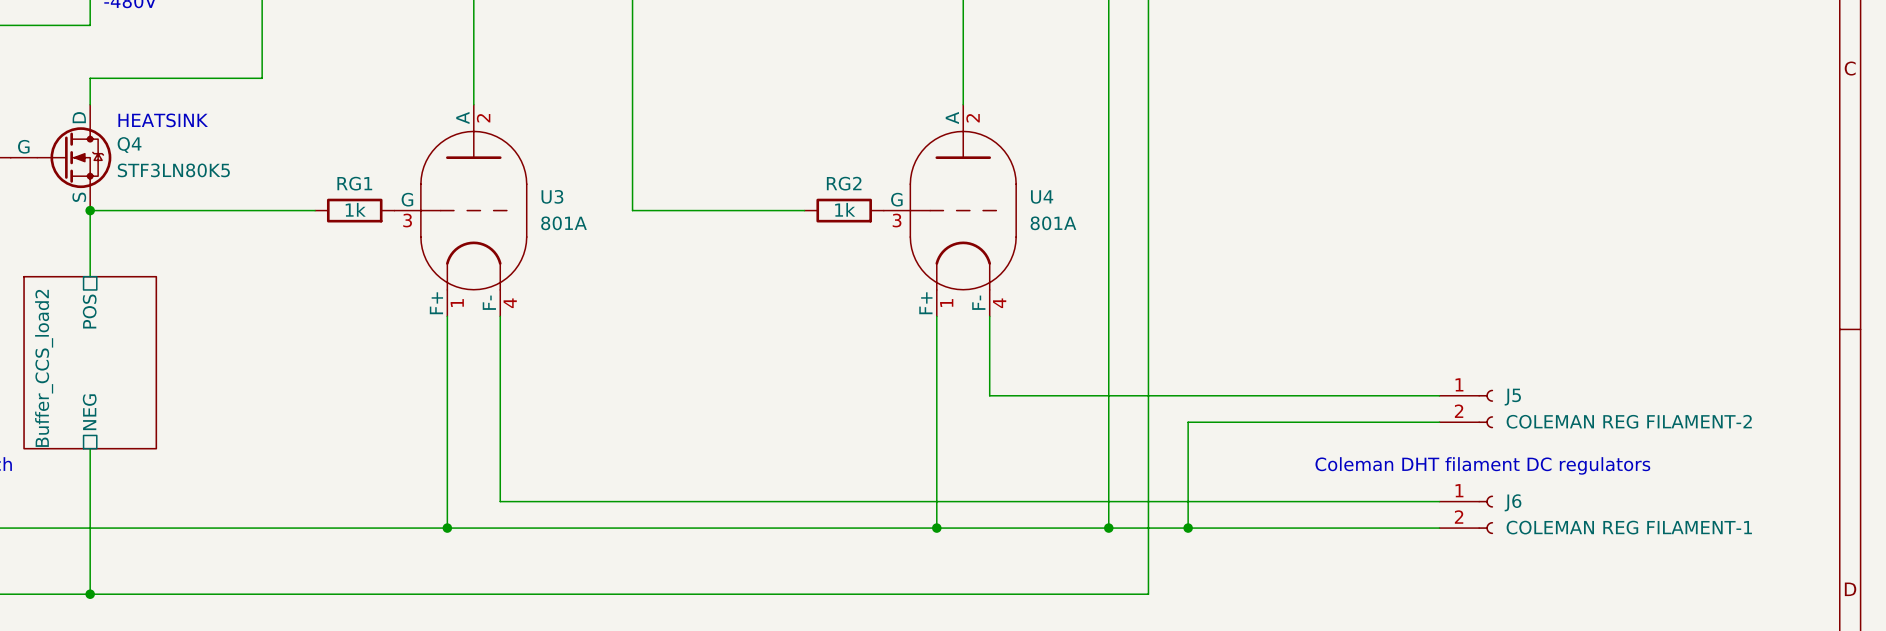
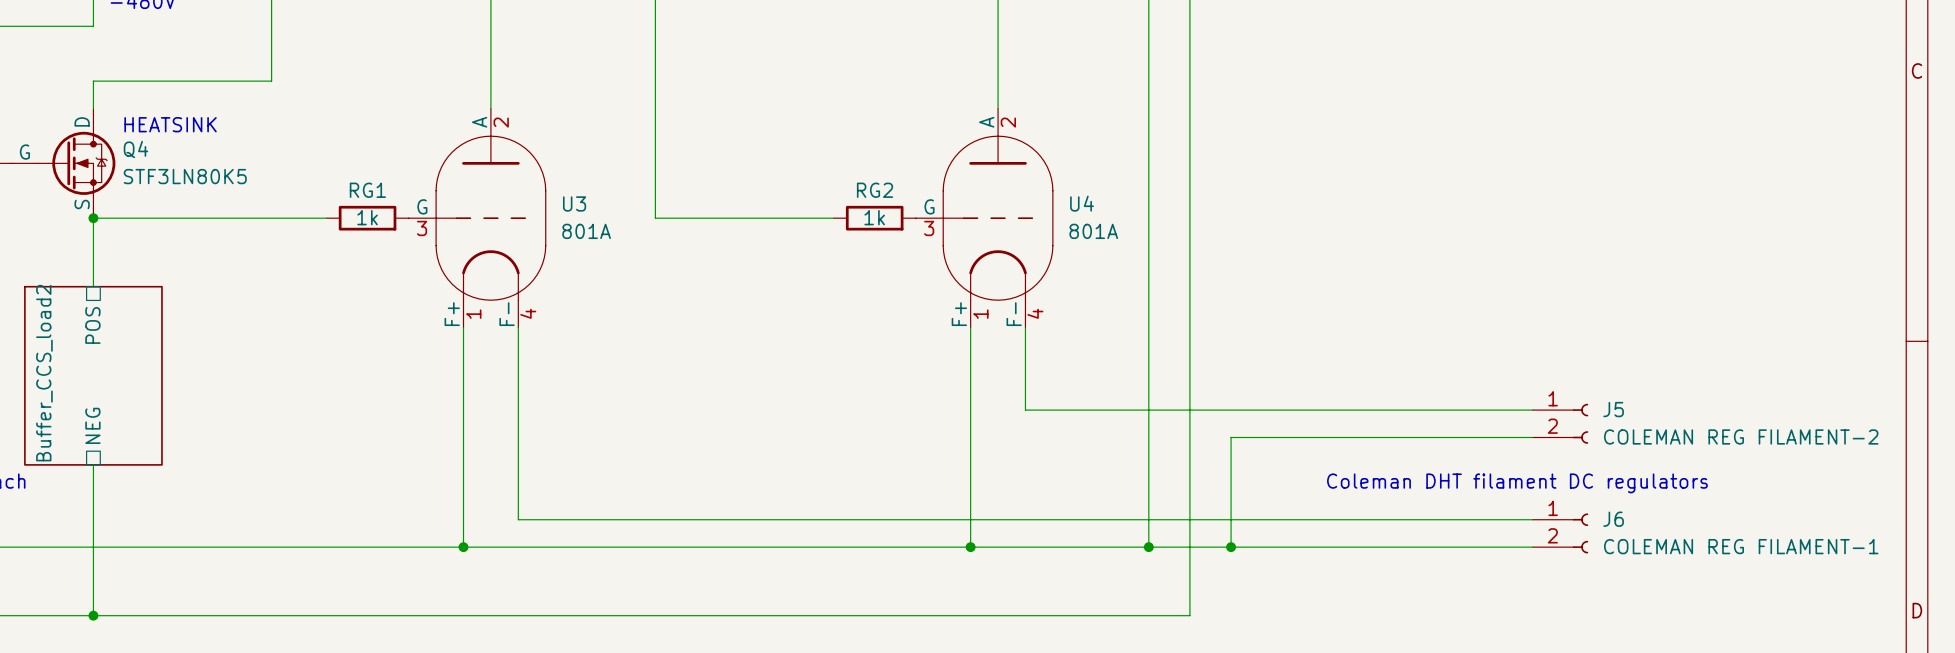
J5 position: (1466, 409) -> (1560, 423)
J6 position: (1466, 514) -> (1560, 533)

